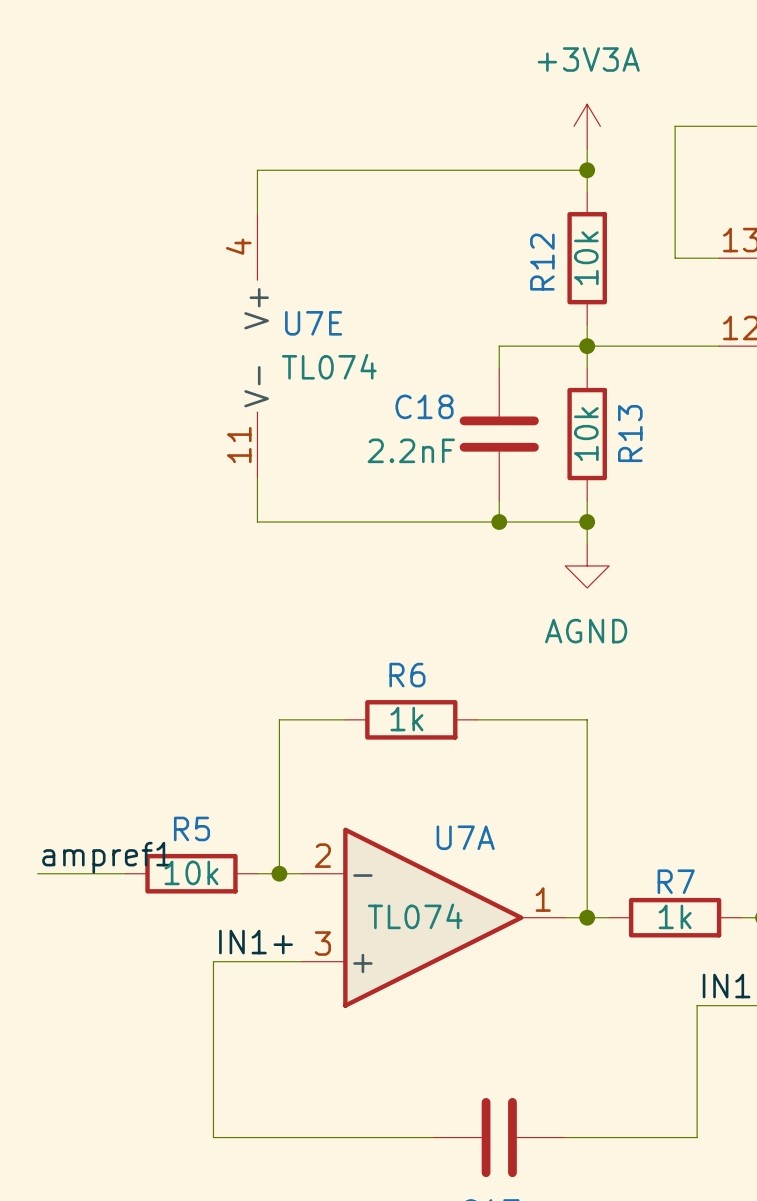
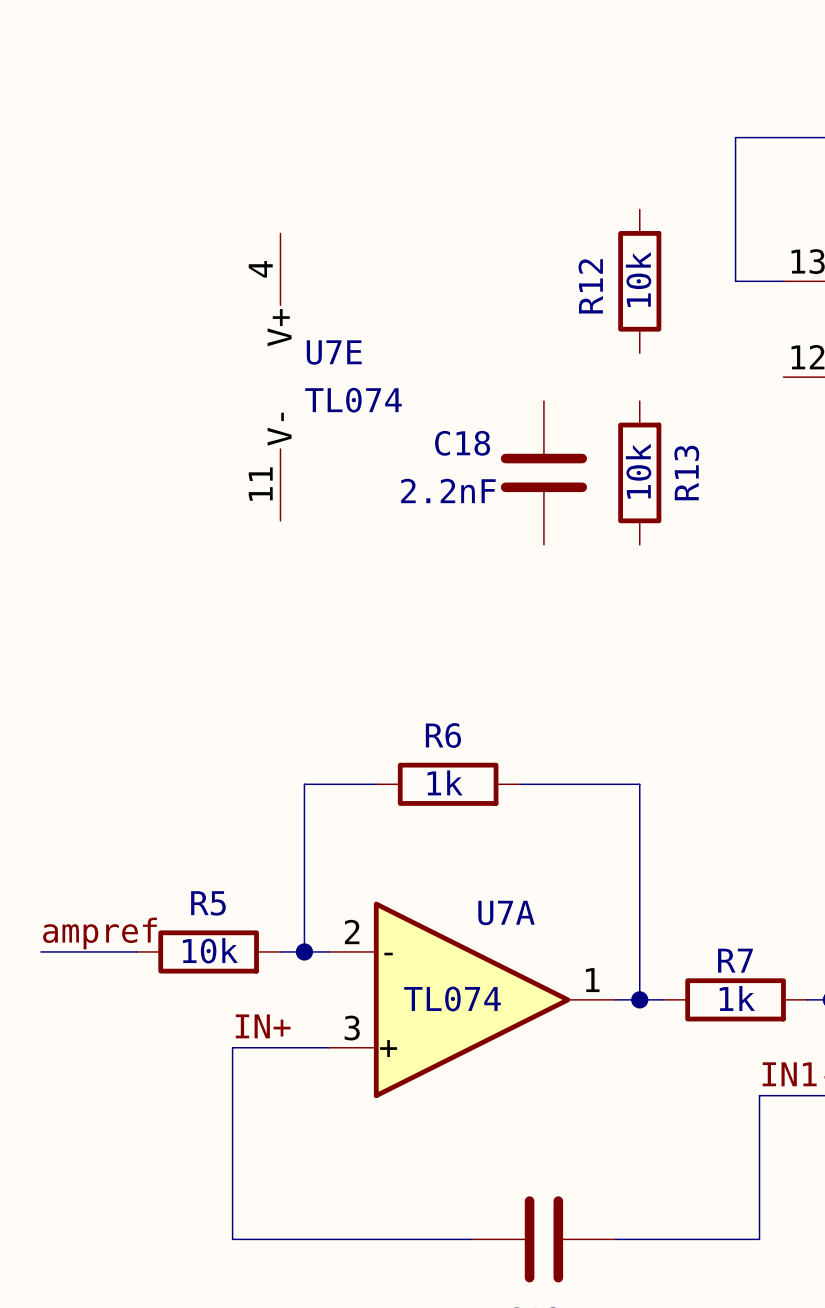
power symbol: +3V3A (587, 126) -> none
wire: (587, 148) (587, 192) -> none
wire: (587, 170) (257, 170) (257, 214) -> none
junction: (587, 170) -> none
wire: (587, 324) (587, 368) -> none
junction: (587, 346) -> none
wire: (719, 346) (499, 346) (499, 368) -> none
wire: (257, 478) (257, 522) (587, 522) -> none
wire: (499, 500) (499, 522) -> none
wire: (587, 500) (587, 543) -> none
junction: (499, 522) -> none
junction: (587, 522) -> none
power symbol: AGND (587, 565) -> none
label: ampref1 (106, 857) -> ampref (100, 933)
label: IN1+ (256, 942) -> IN+ (263, 1026)

